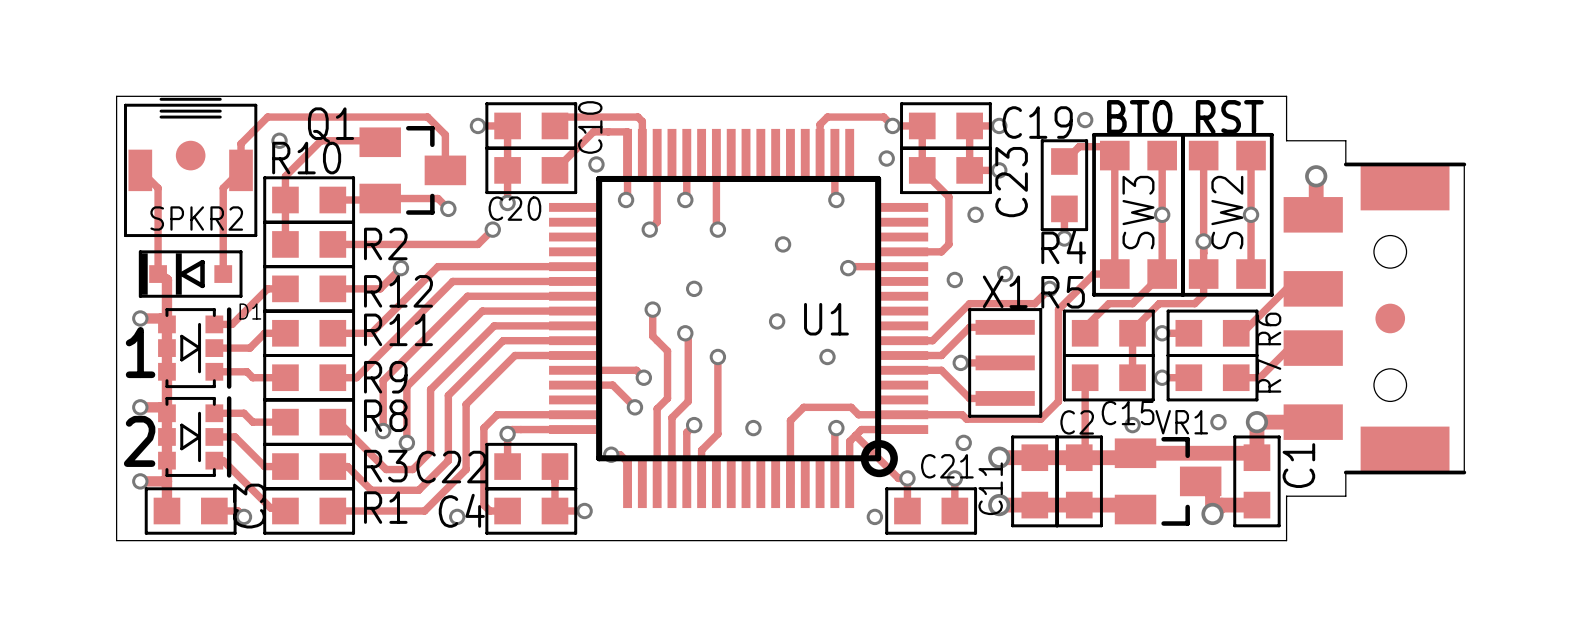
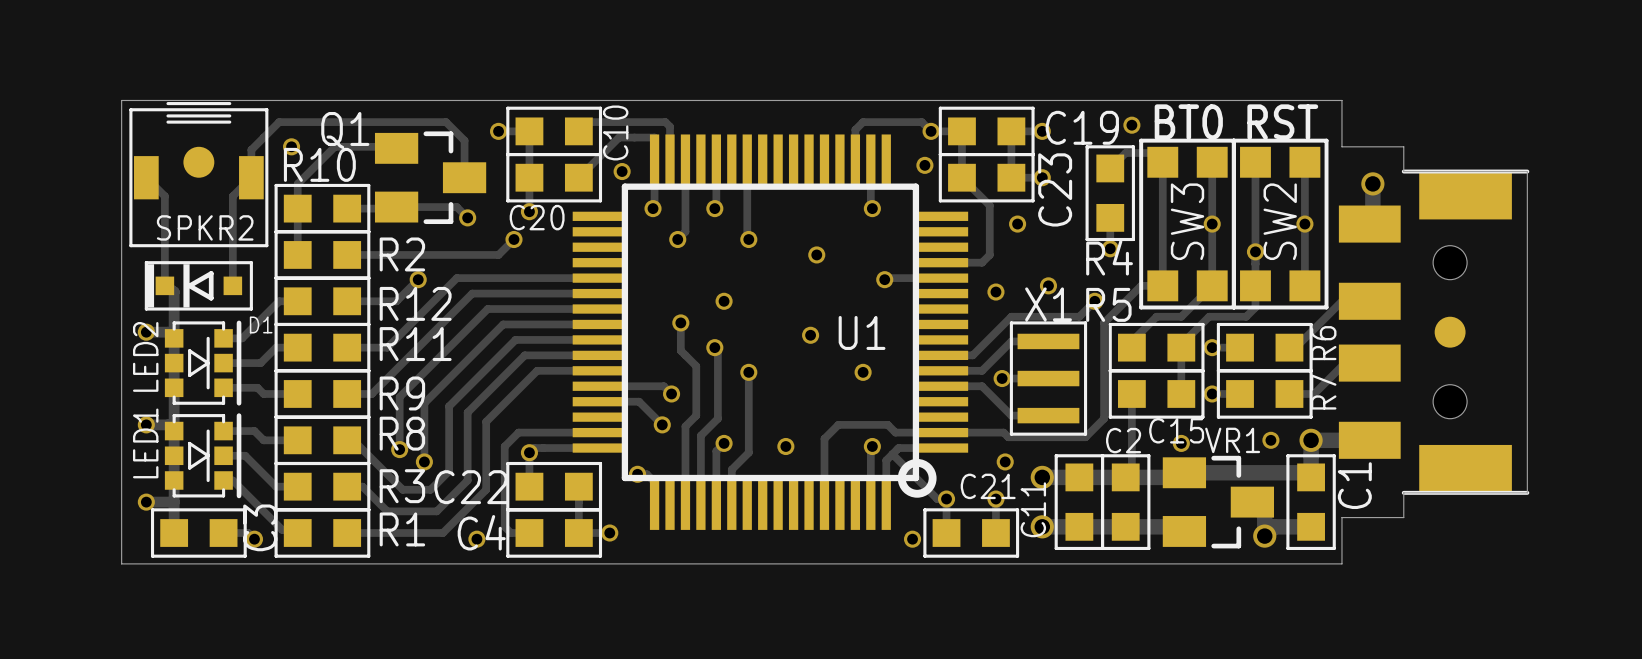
LED2 name: none -> LED2 (145, 356)
text: 1 (140, 352) -> none
LED1 name: none -> LED1 (145, 443)
text: 2 (139, 441) -> none

